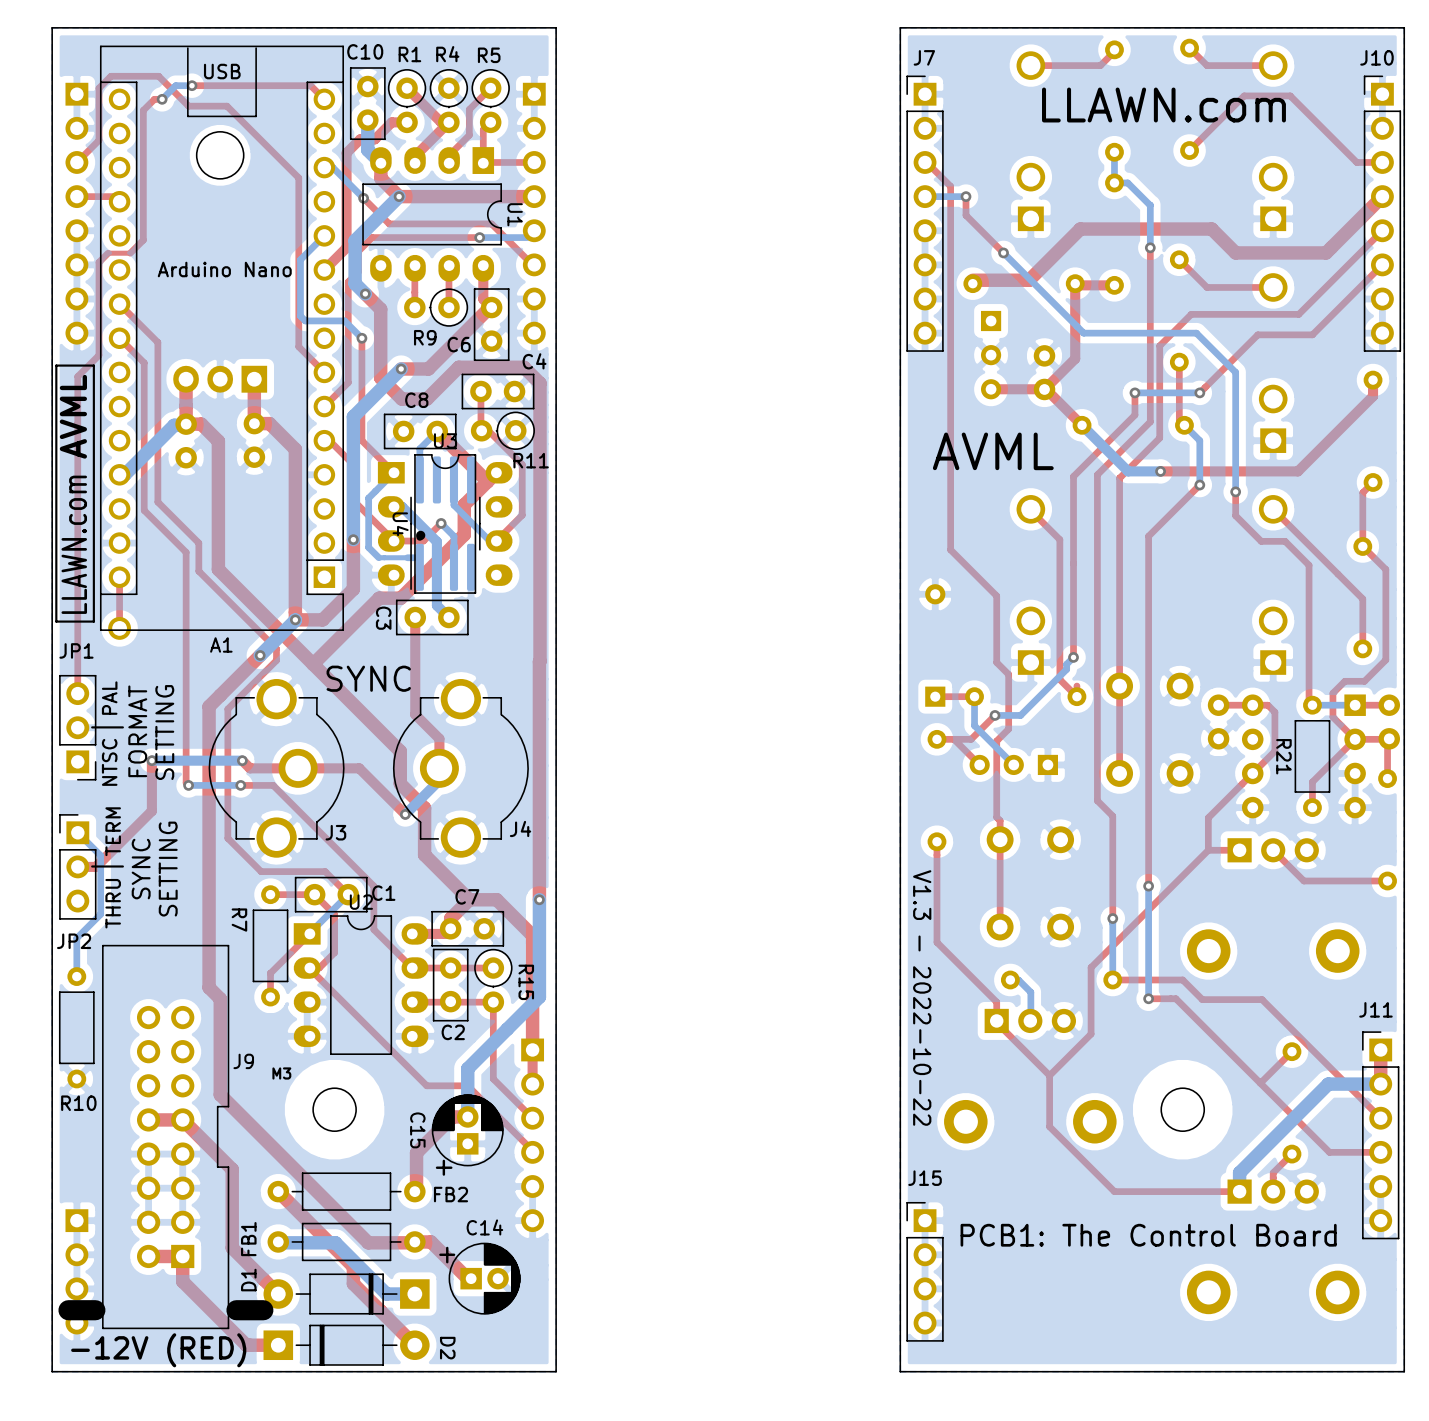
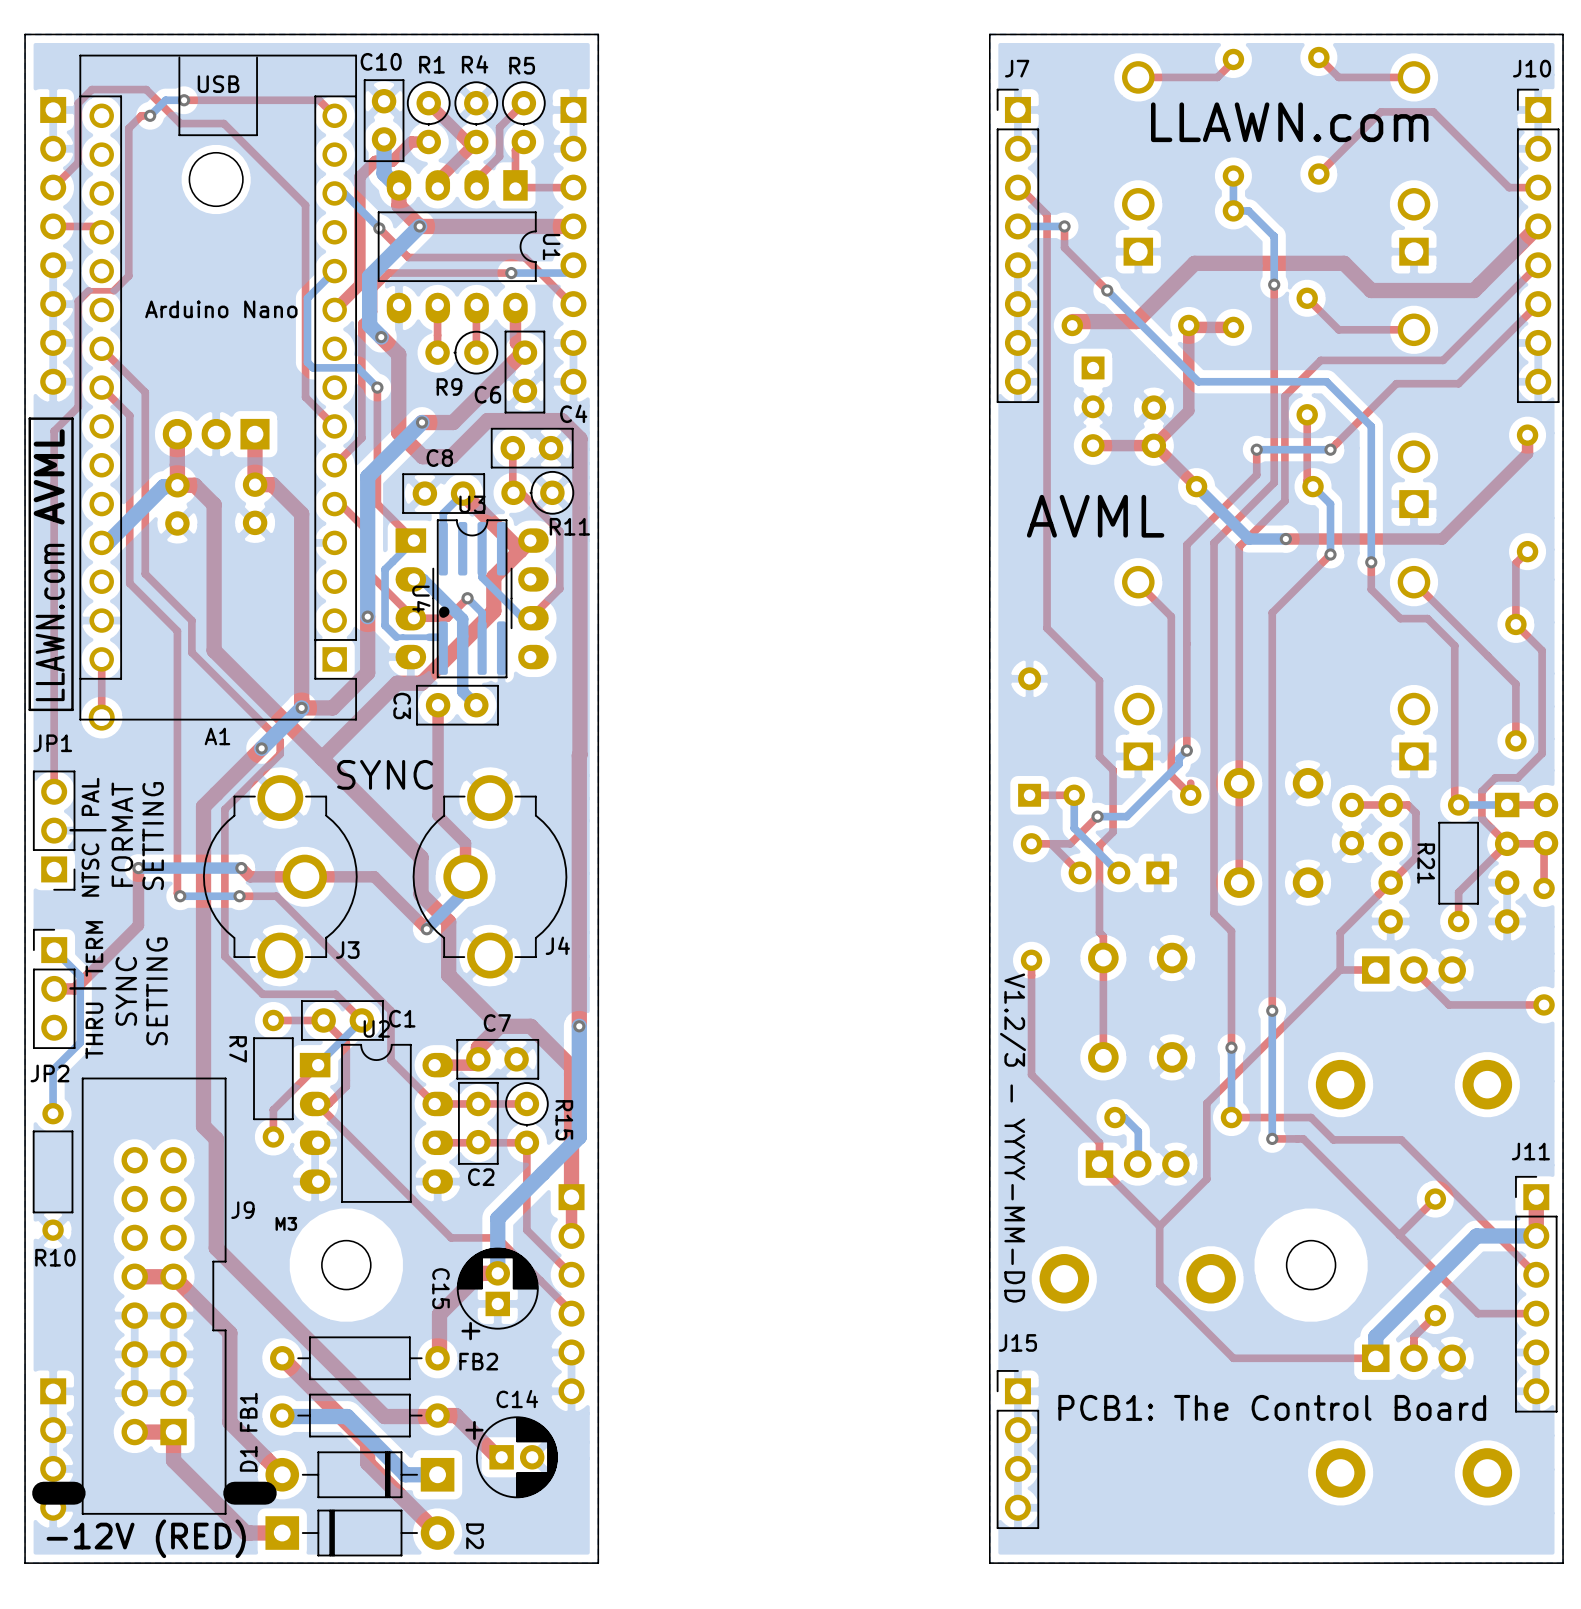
text: V1.3 — 2022-10-22 (922, 997) -> V1.2/3 — YYYY-MM-DD (1012, 1138)

